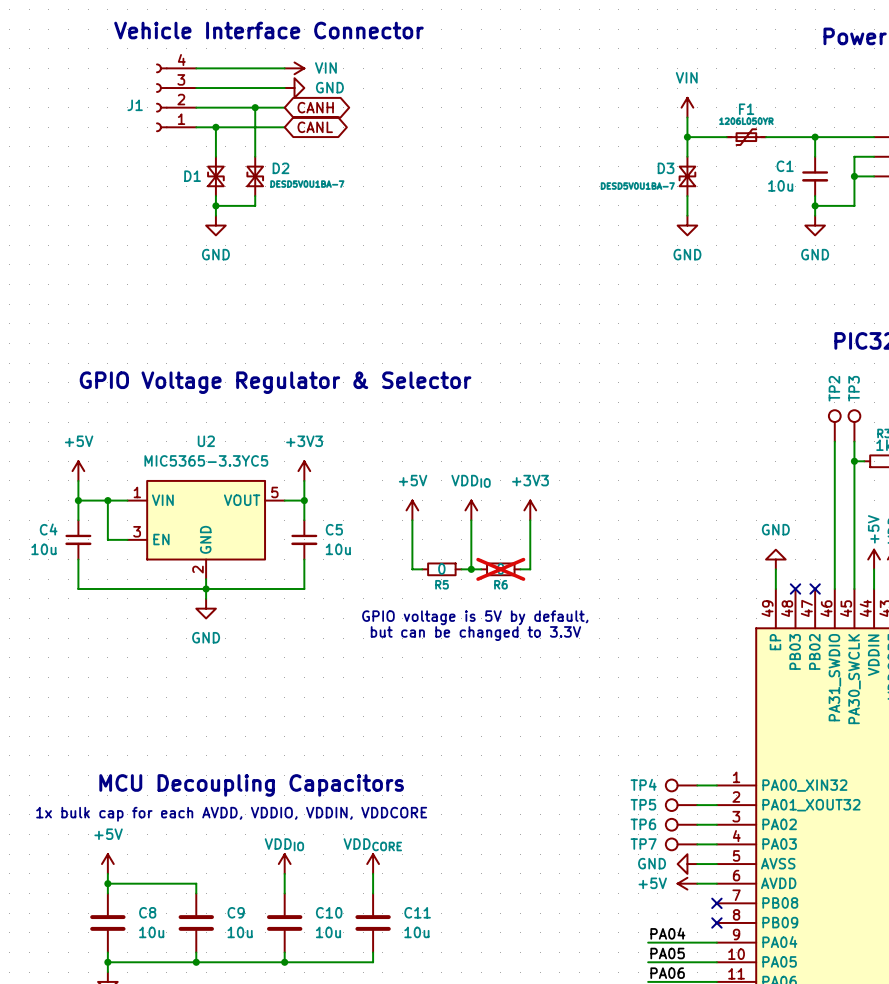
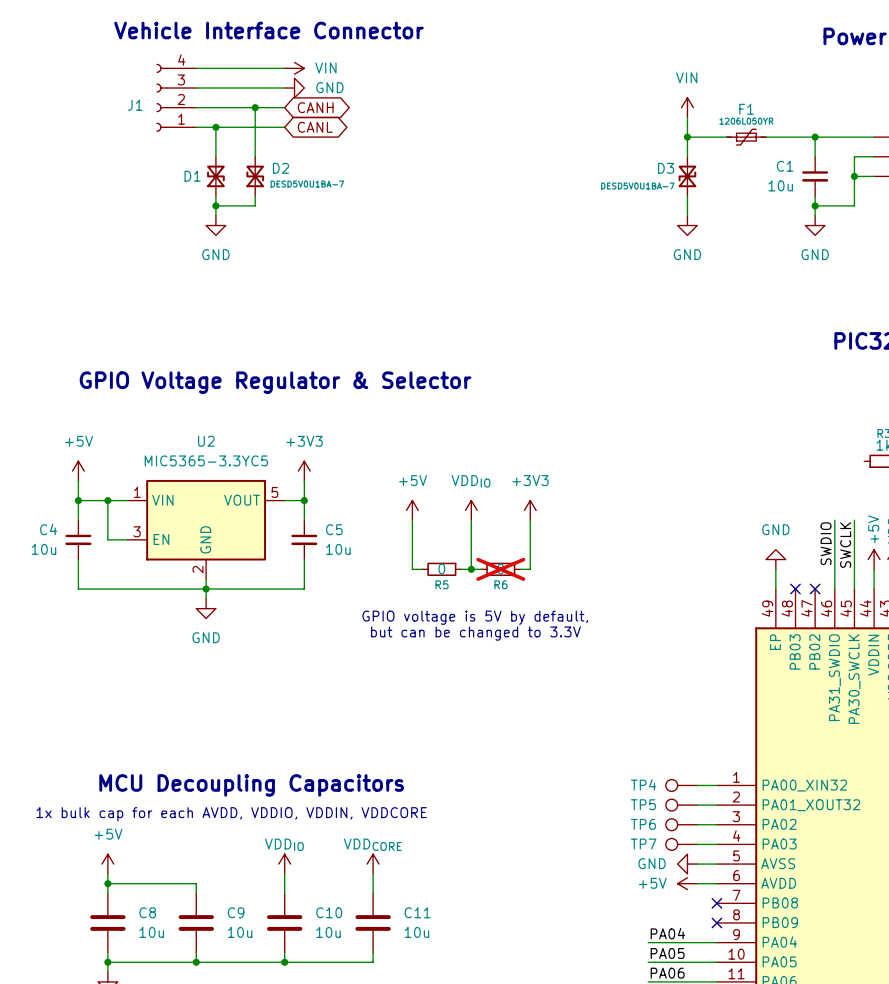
TP2: (834, 425) -> none
TP3: (854, 425) -> none
wire: (834, 441) (834, 520) -> none
wire: (854, 441) (854, 520) -> none
wire: (854, 461) (864, 461) -> none
junction: (854, 461) -> none
label: none -> SWDIO (826, 543)
label: none -> SWCLK (845, 545)

